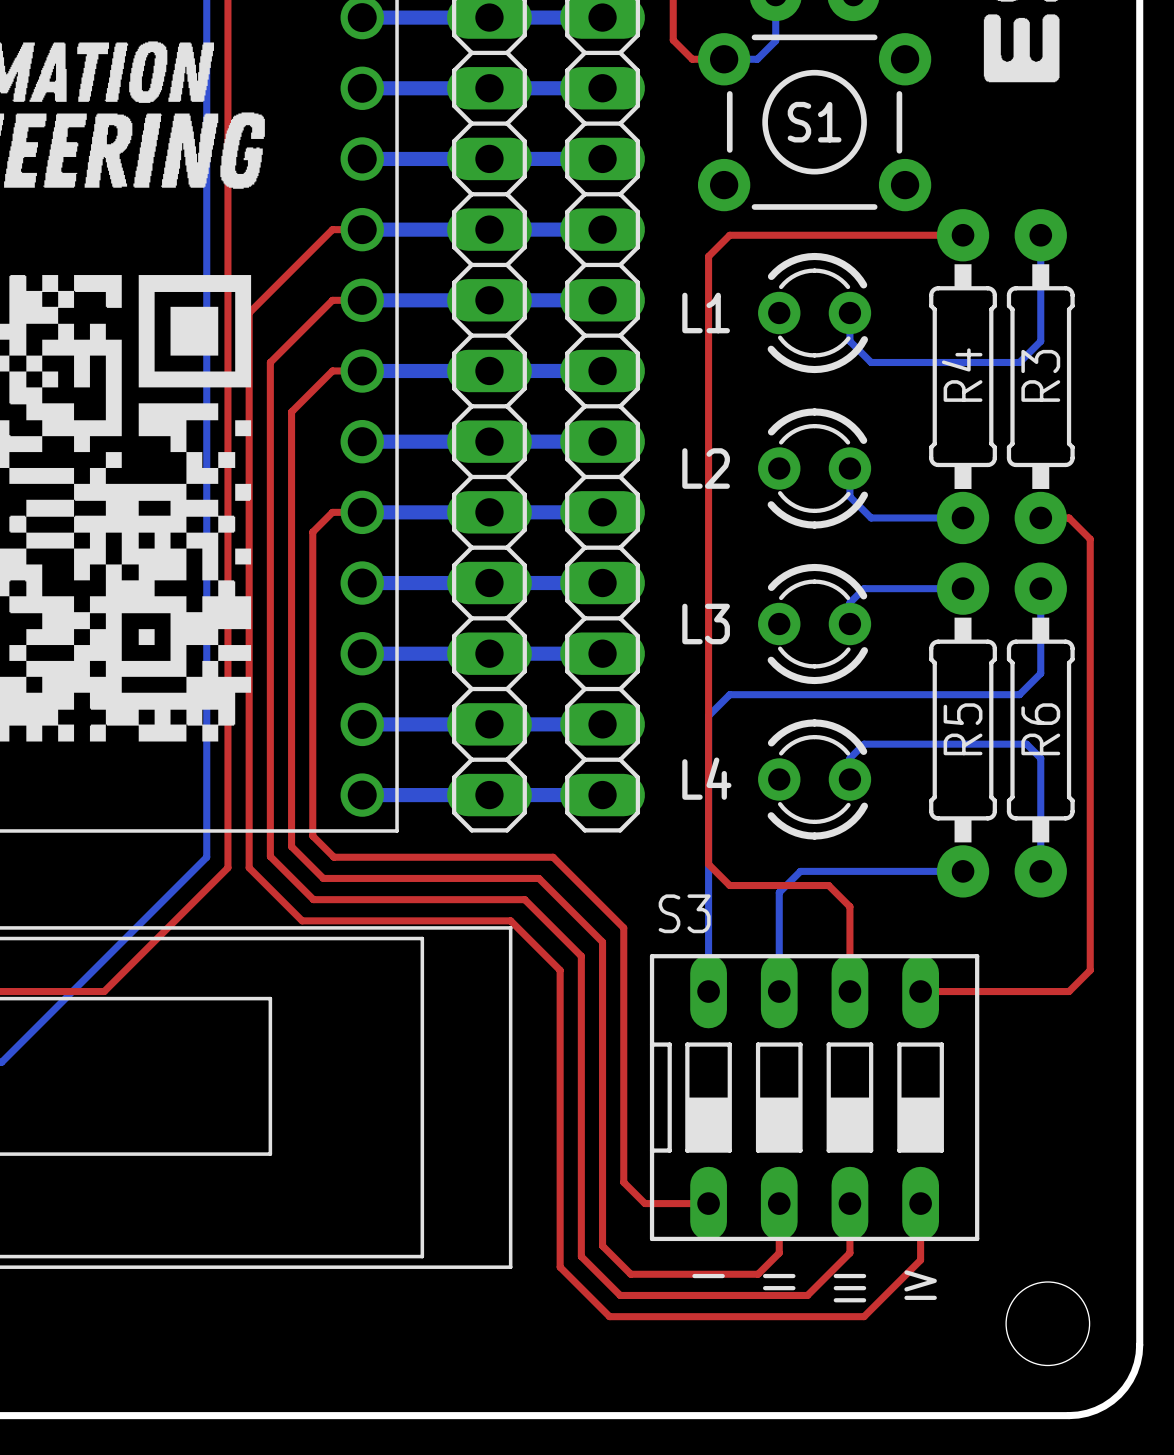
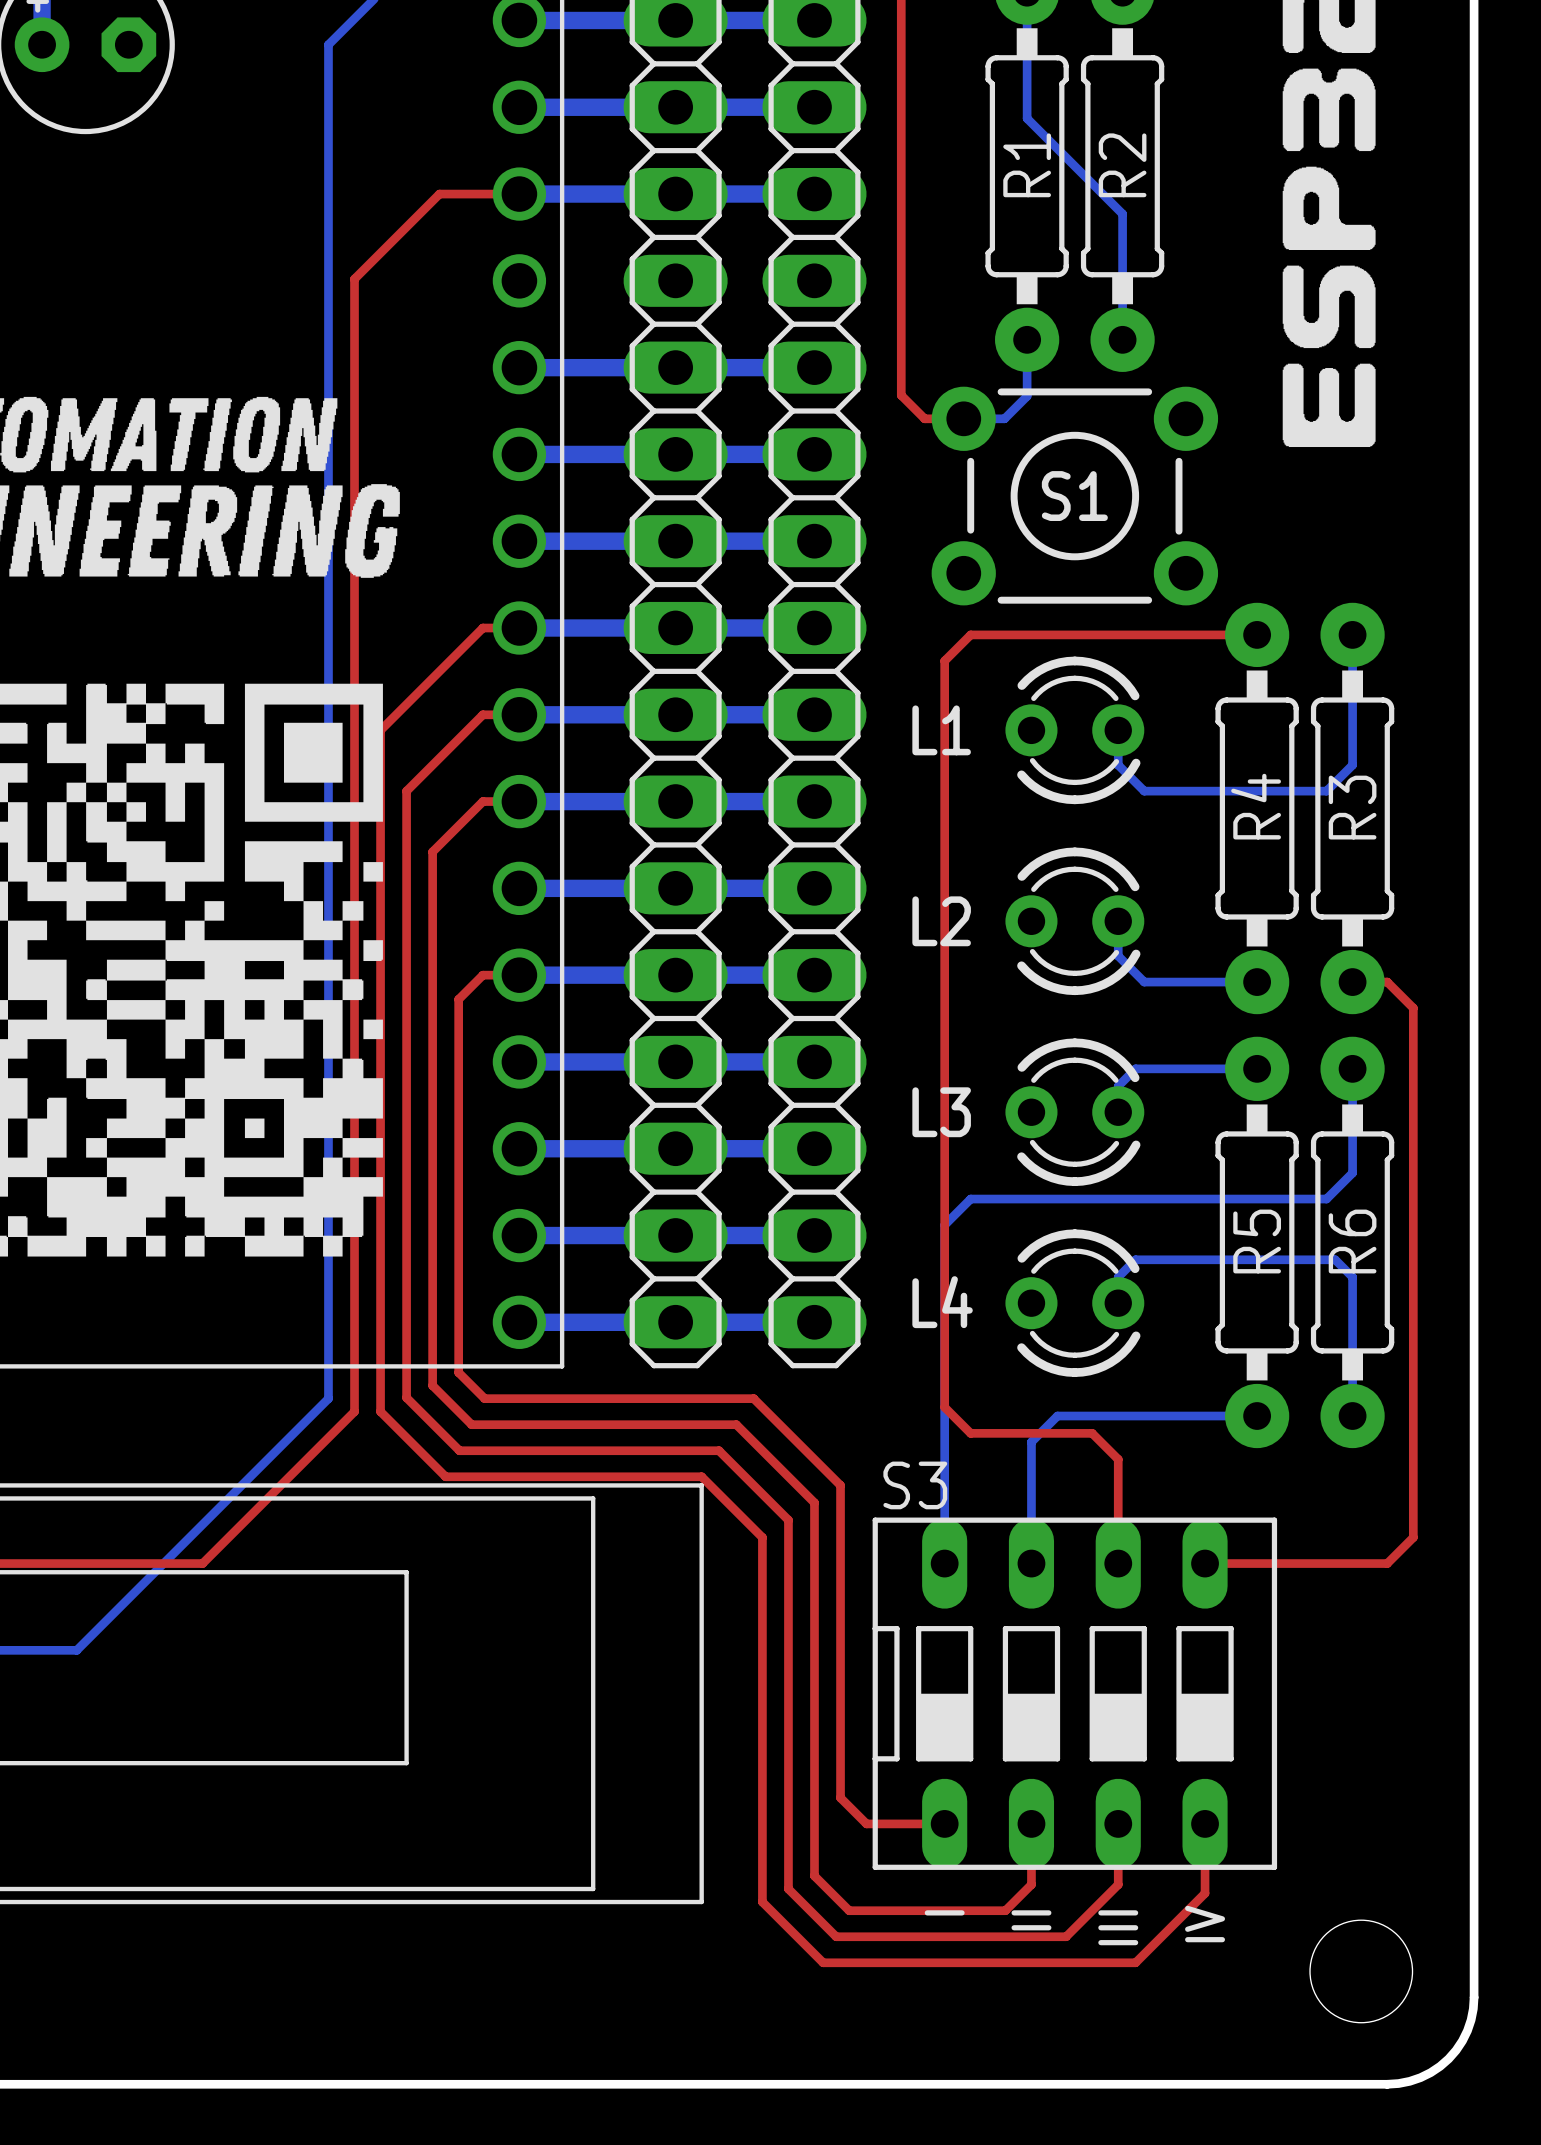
S3 name position: S3 (684, 913) -> S3 (915, 1485)

